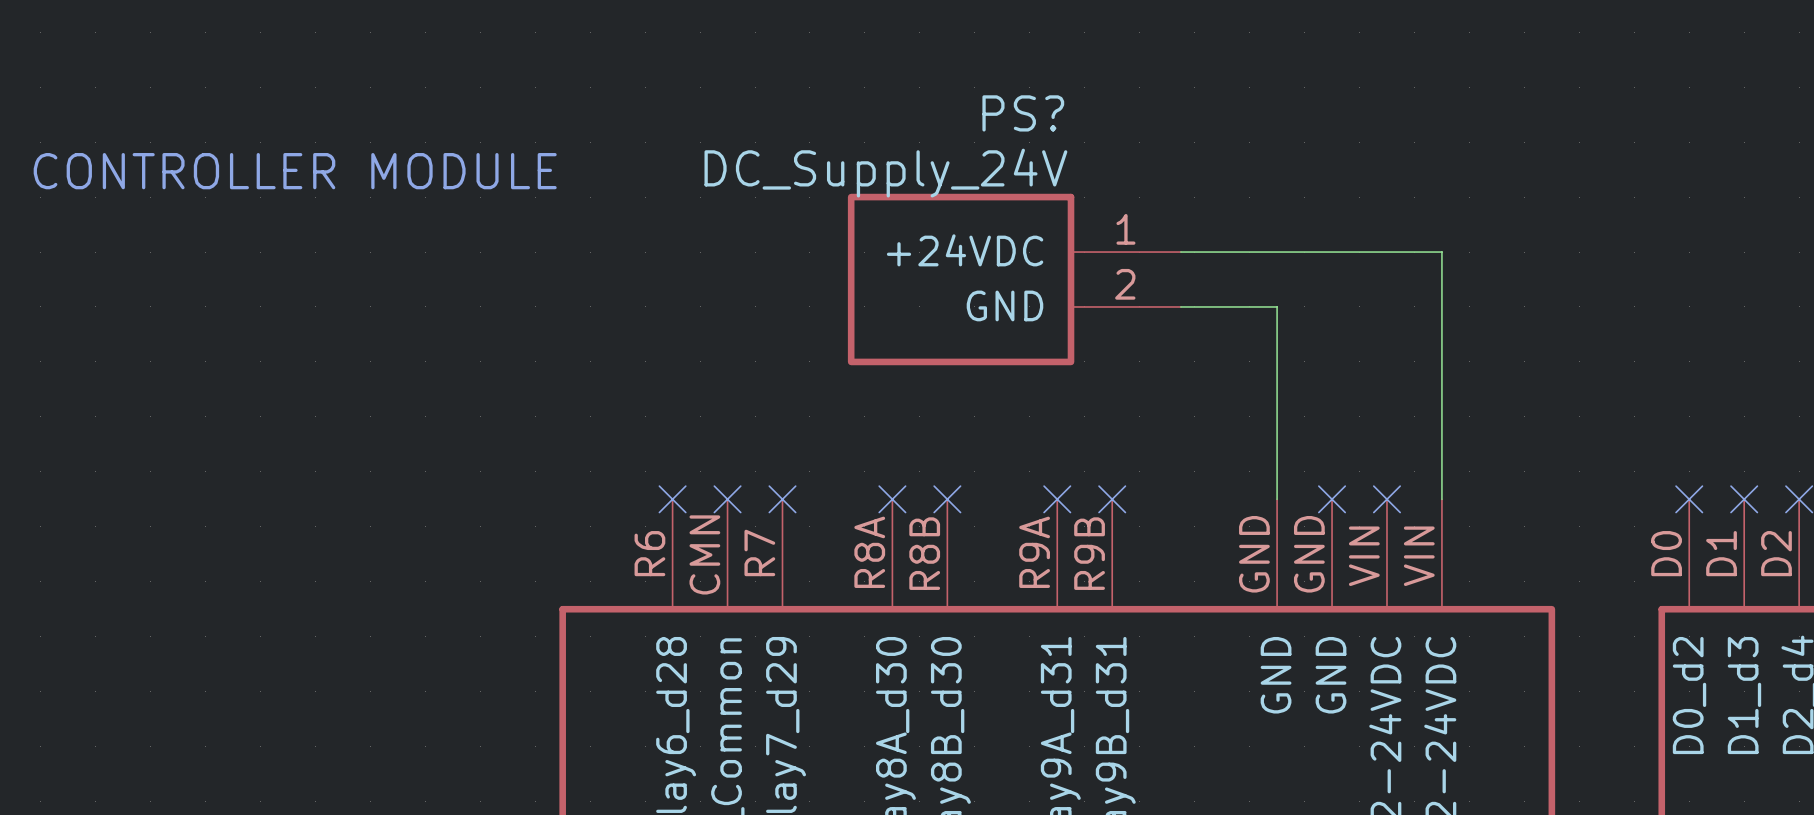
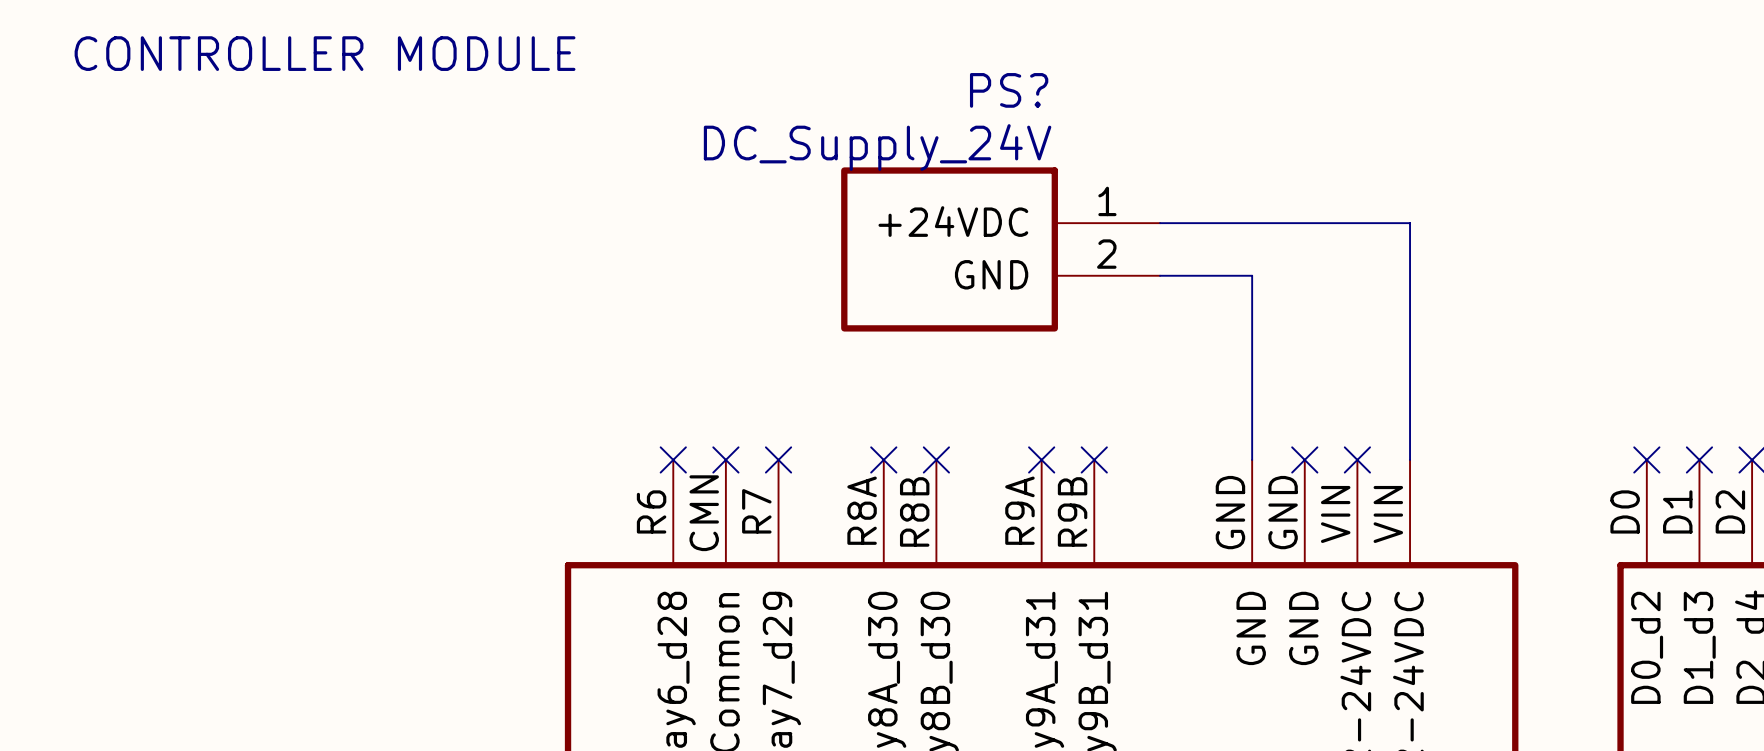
text position: CONTROLLER MODULE (295, 171) -> CONTROLLER MODULE (325, 53)

